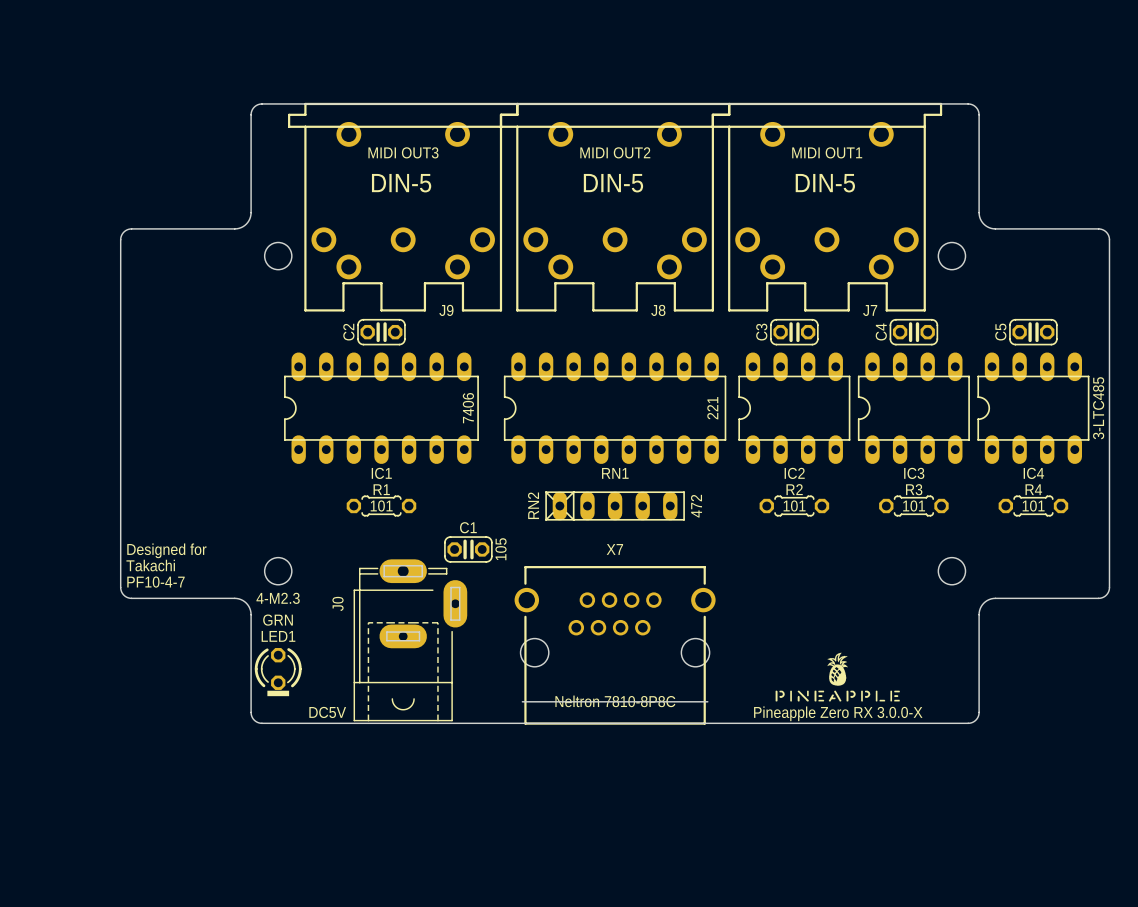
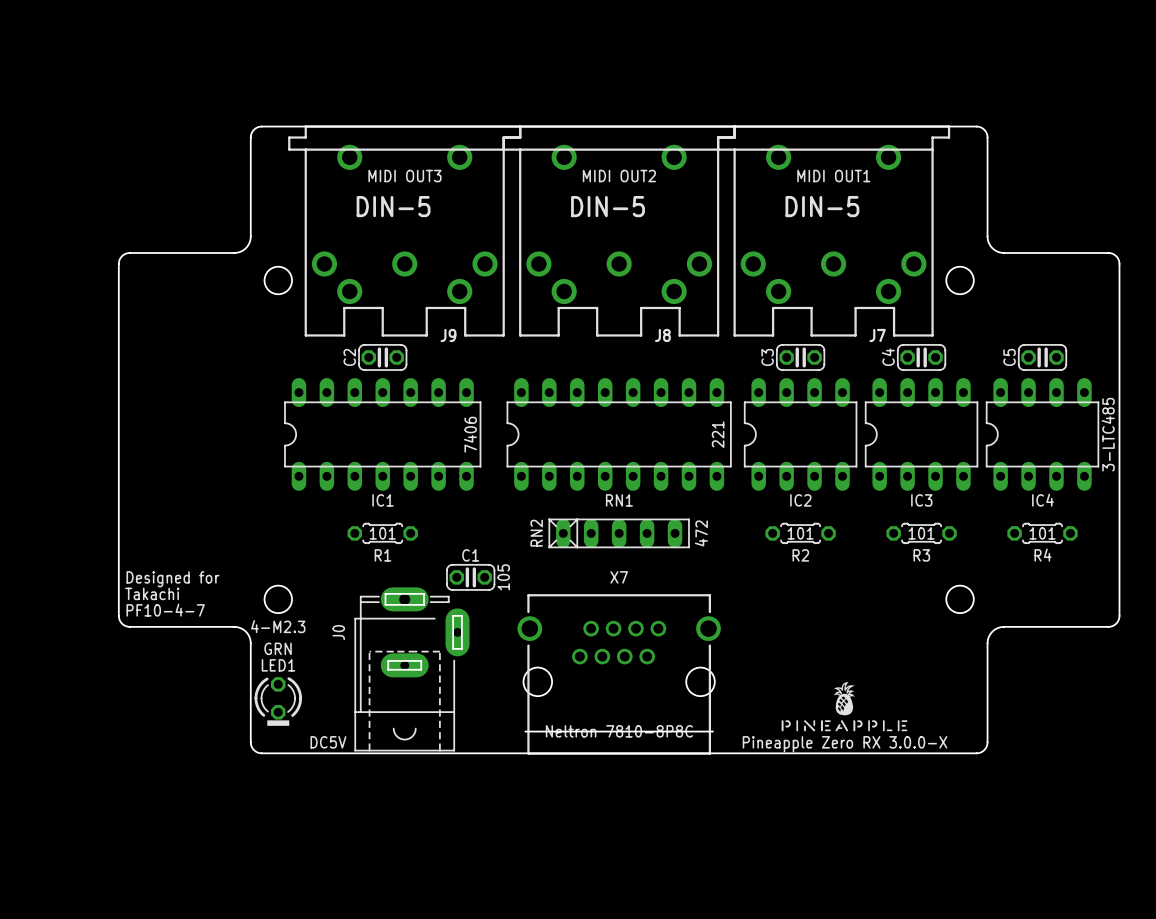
R1 name position: R1 (381, 489) -> R1 (382, 555)
R2 name position: R2 (794, 489) -> R2 (800, 555)
R3 name position: R3 (914, 489) -> R3 (921, 555)
R4 name position: R4 (1033, 489) -> R4 (1042, 555)

